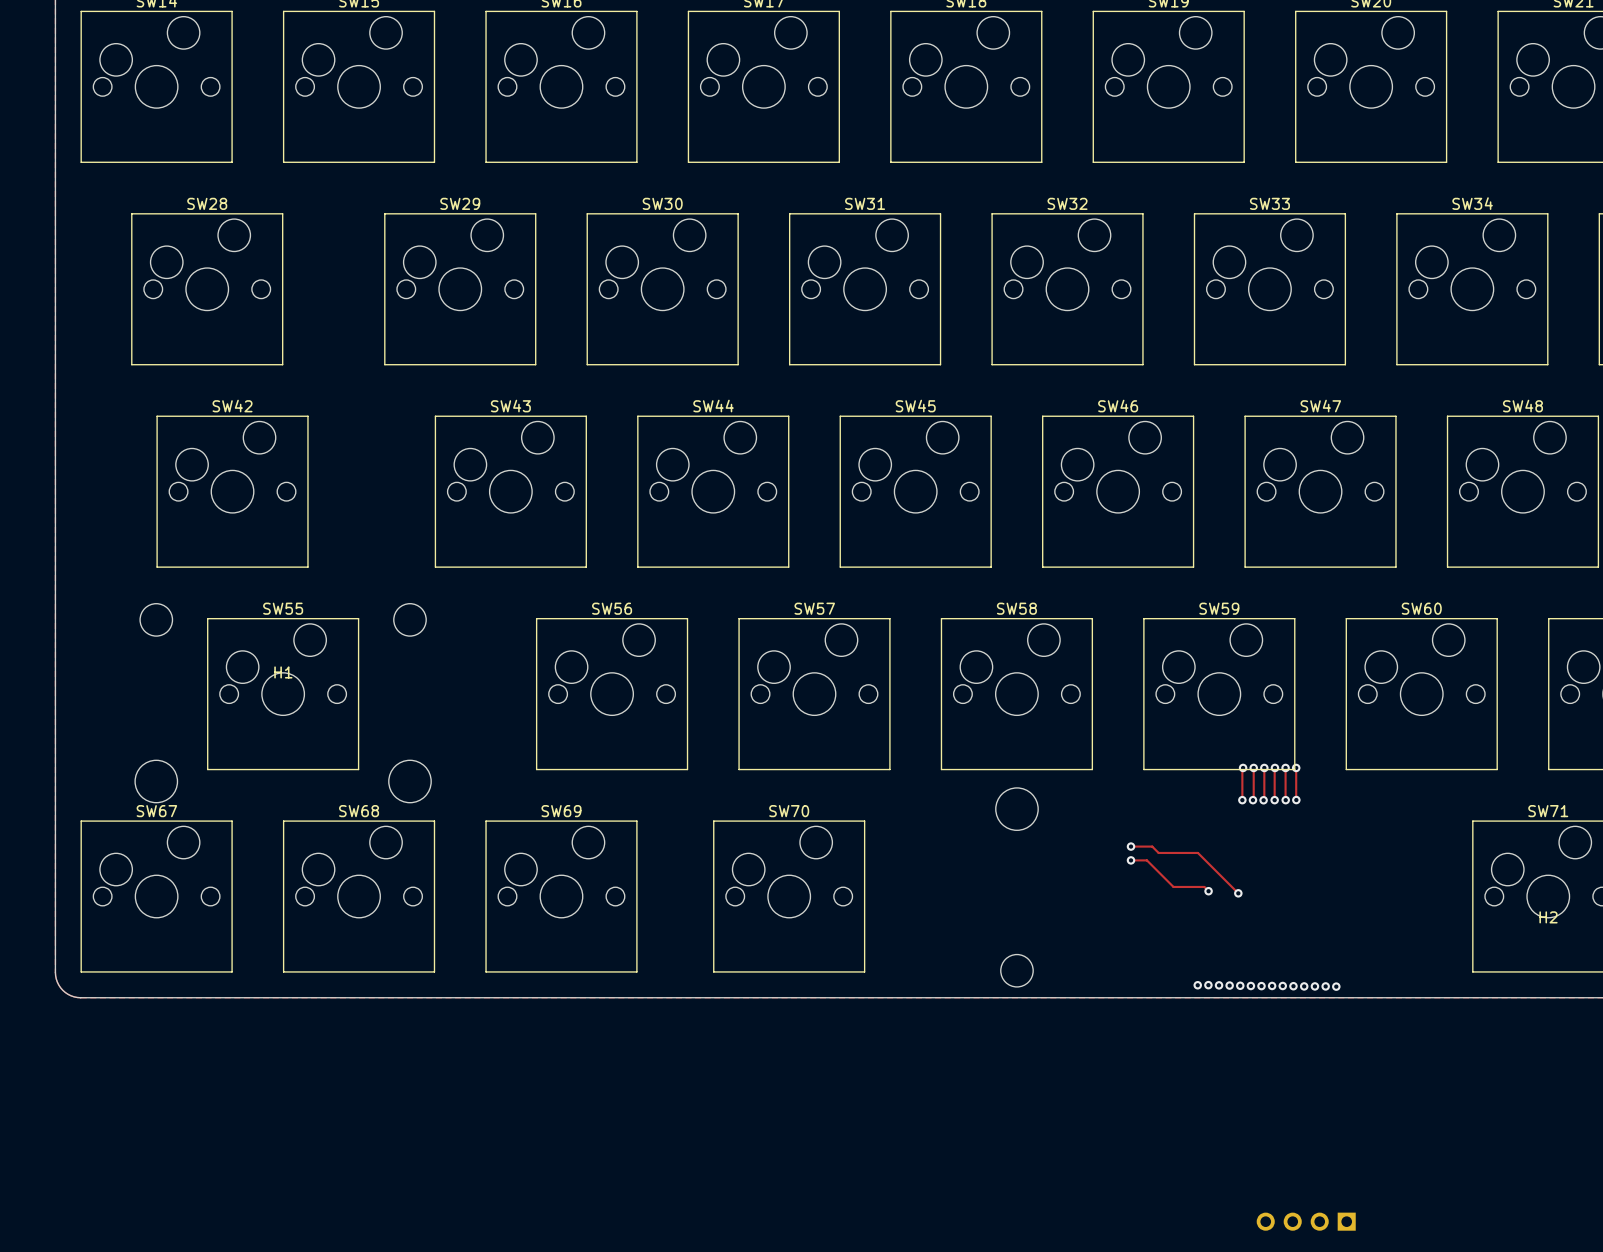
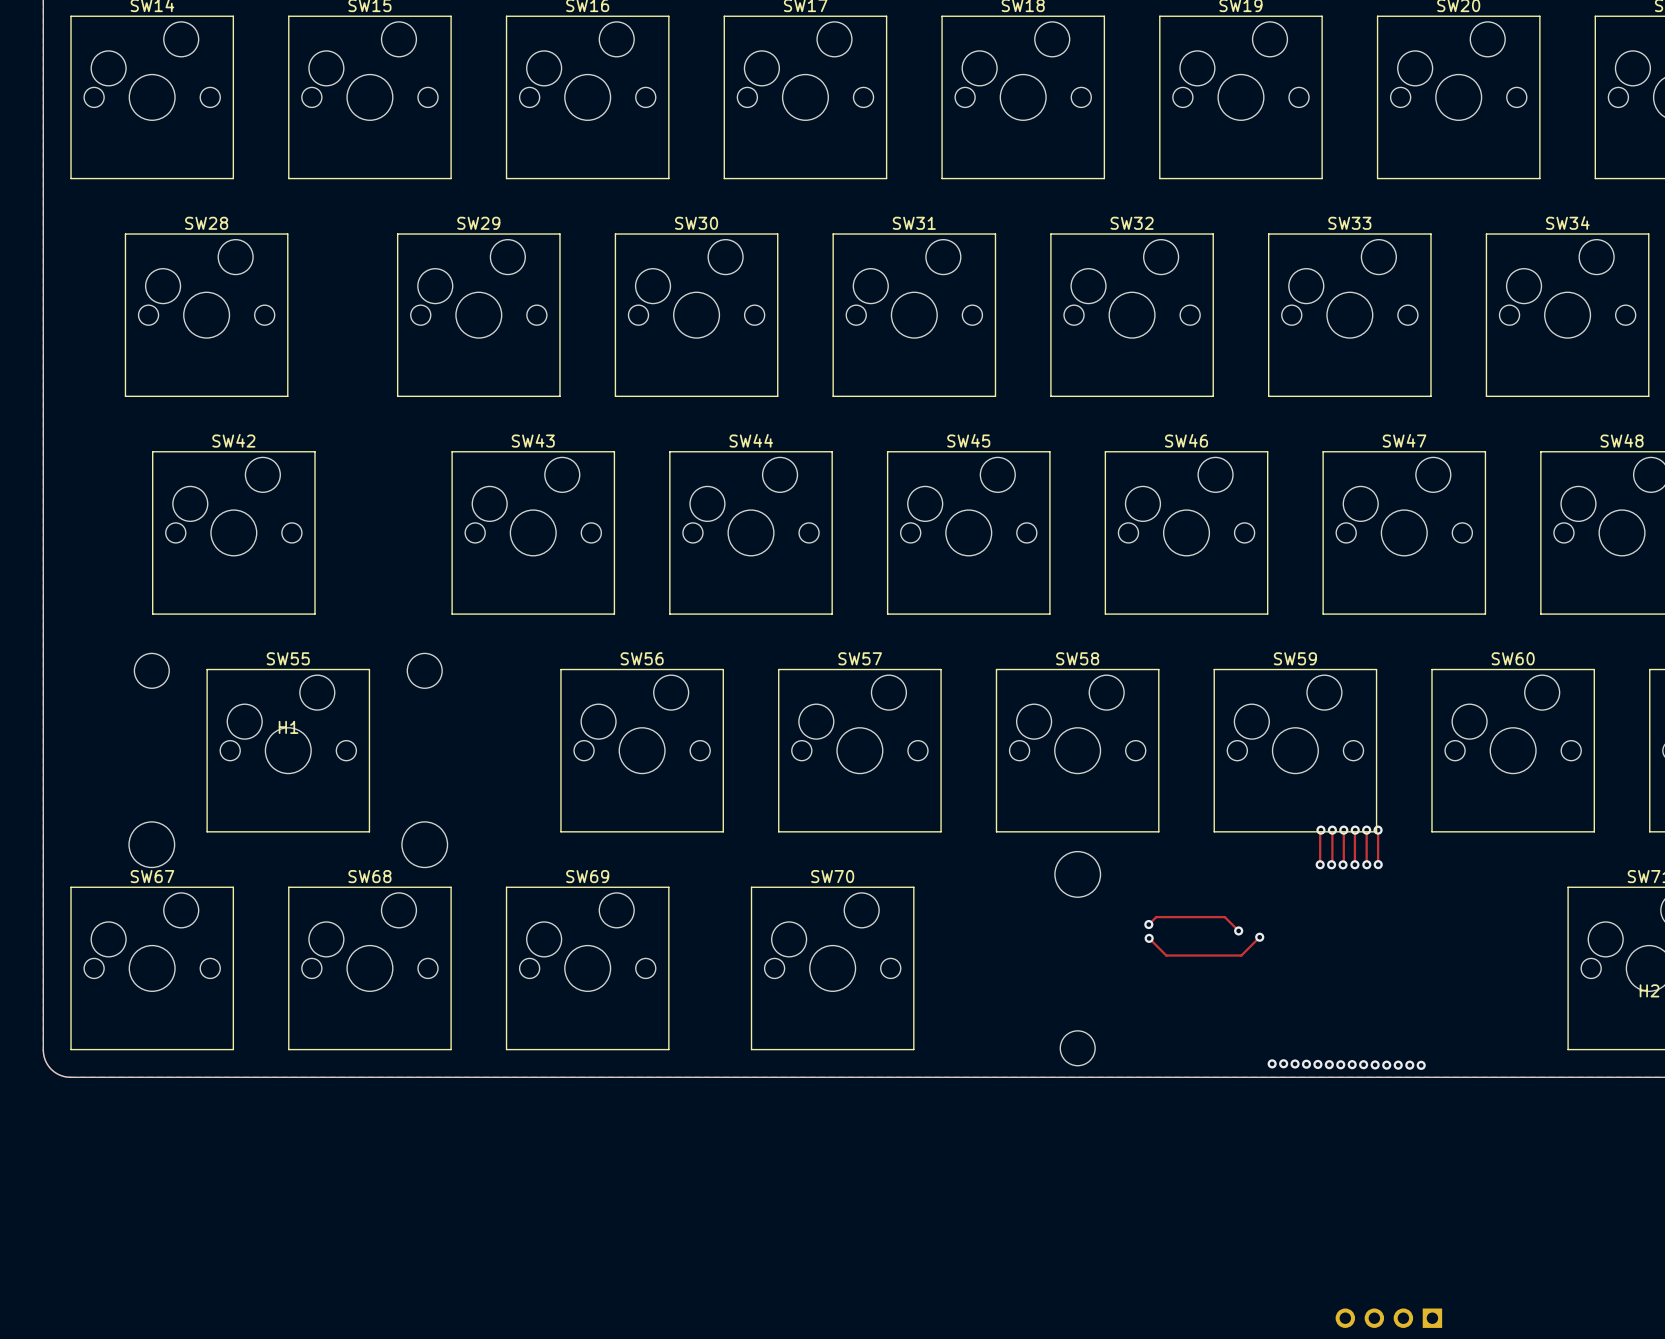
track: (1131, 846) (1152, 846) (1158, 852) (1197, 852) (1238, 893) -> none
via: (1131, 846) -> none
track: none -> (1148, 924) (1156, 917) (1224, 917) (1238, 930)
via: none -> (1148, 924)
track: (1131, 860) (1146, 860) (1173, 886) (1204, 886) (1208, 891) -> none
via: (1131, 860) -> none
via: none -> (1238, 930)
track: none -> (1259, 937) (1241, 955) (1166, 955) (1149, 938)
via: none -> (1259, 937)
via: none -> (1149, 938)
via: (1208, 891) -> none
via: (1238, 893) -> none

